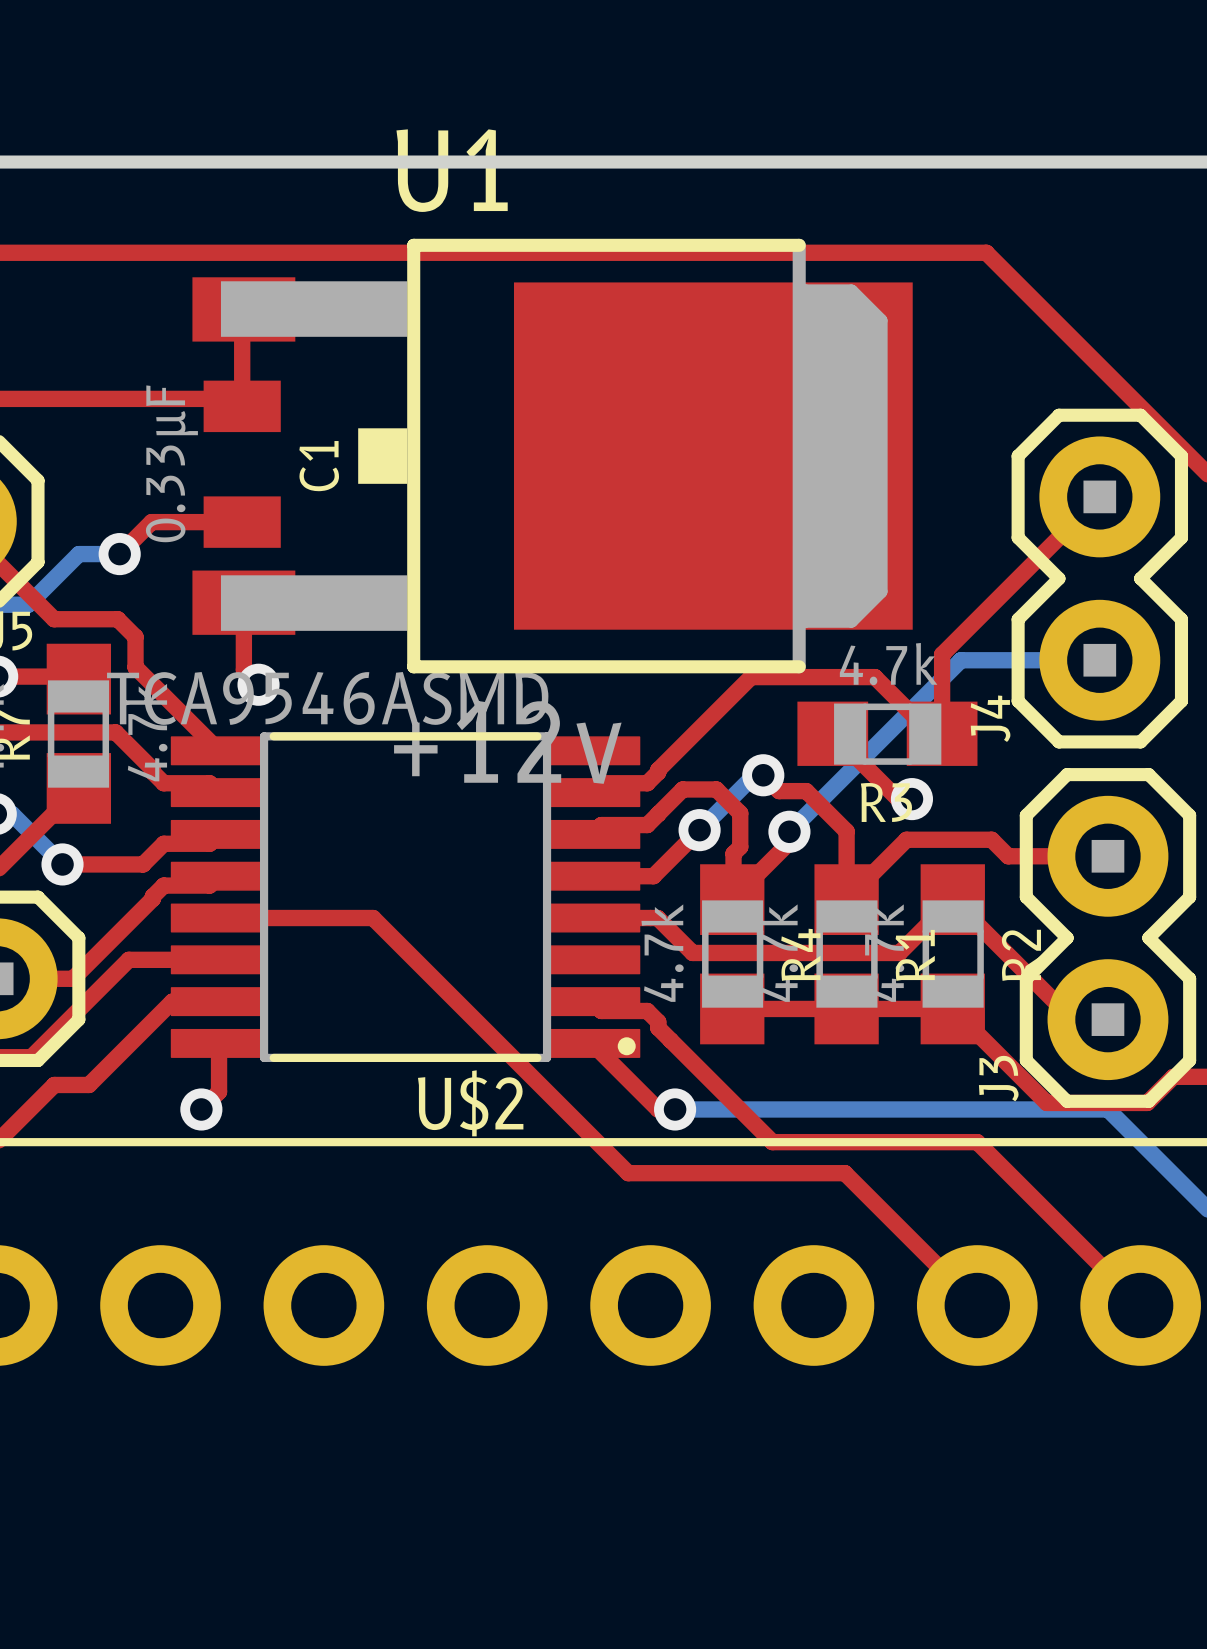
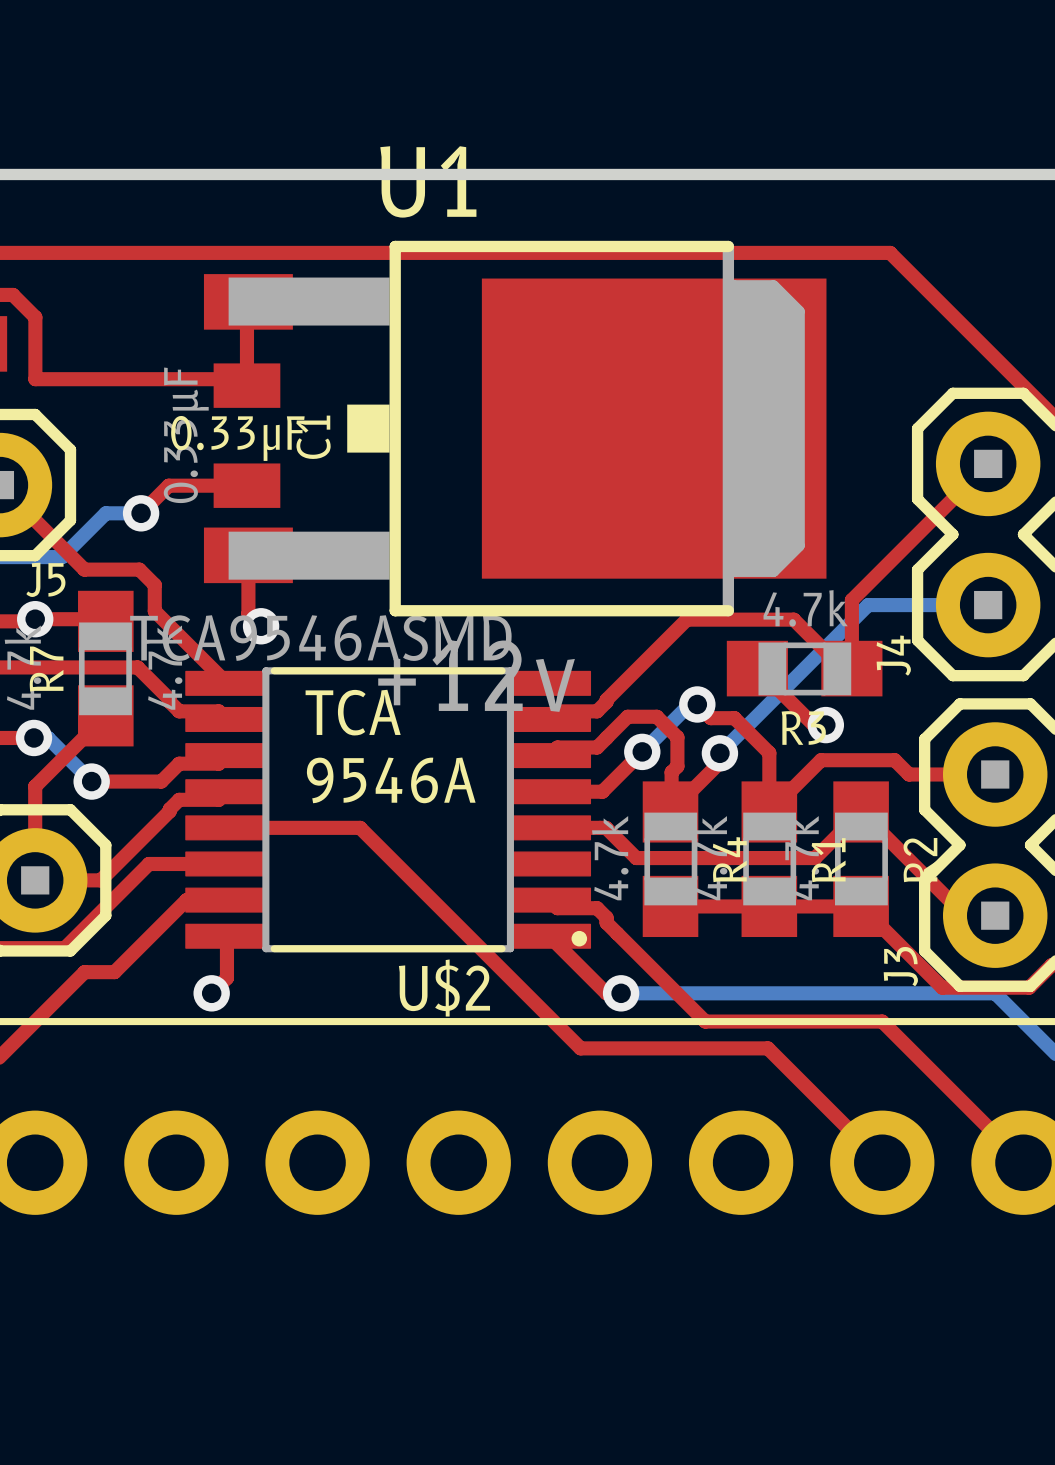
text: none -> 0.33μF (237, 438)
text: none -> TCA (353, 712)
text: none -> 9546A (391, 780)

